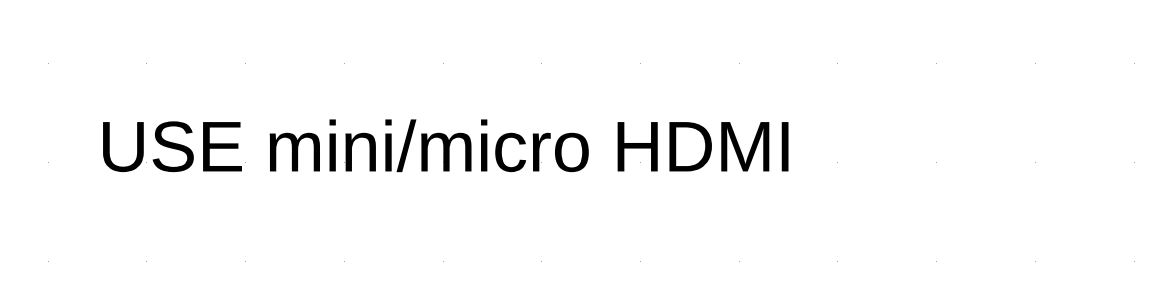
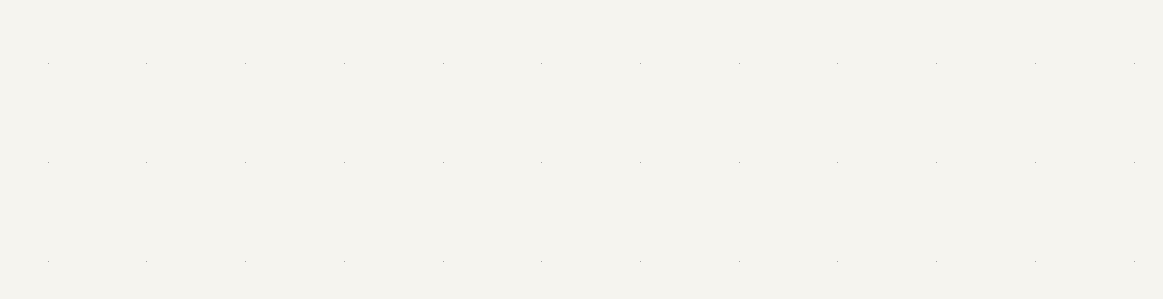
text: USE mini/micro HDMI (445, 145) -> none

